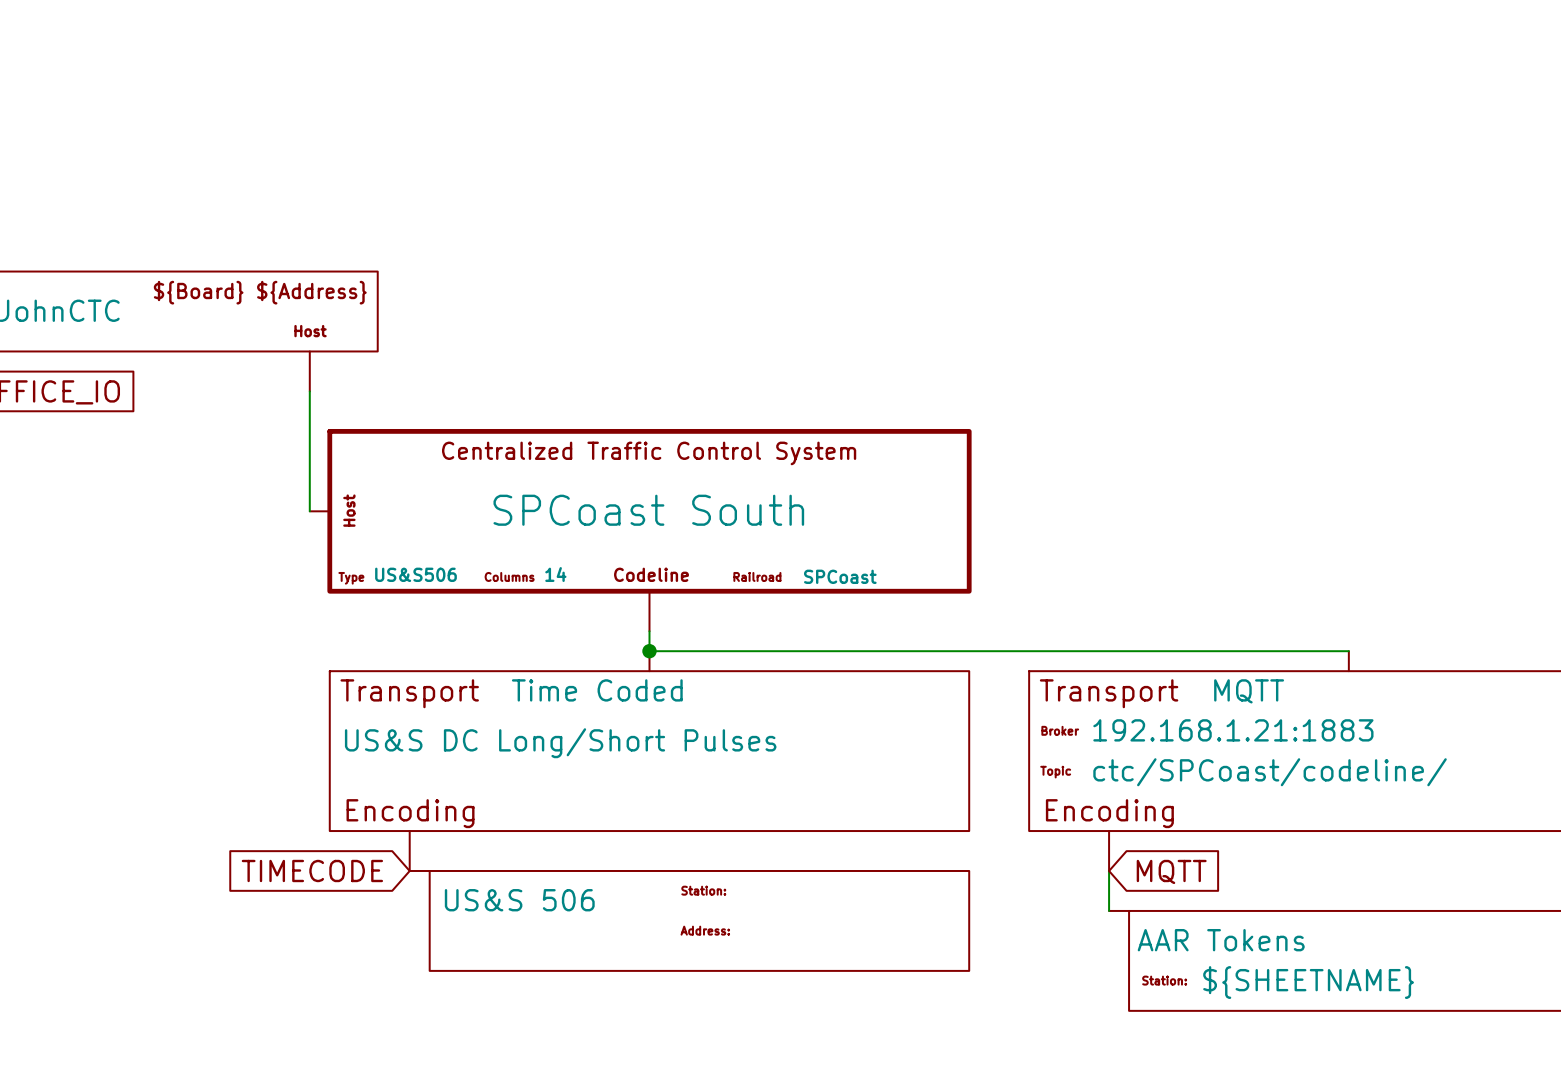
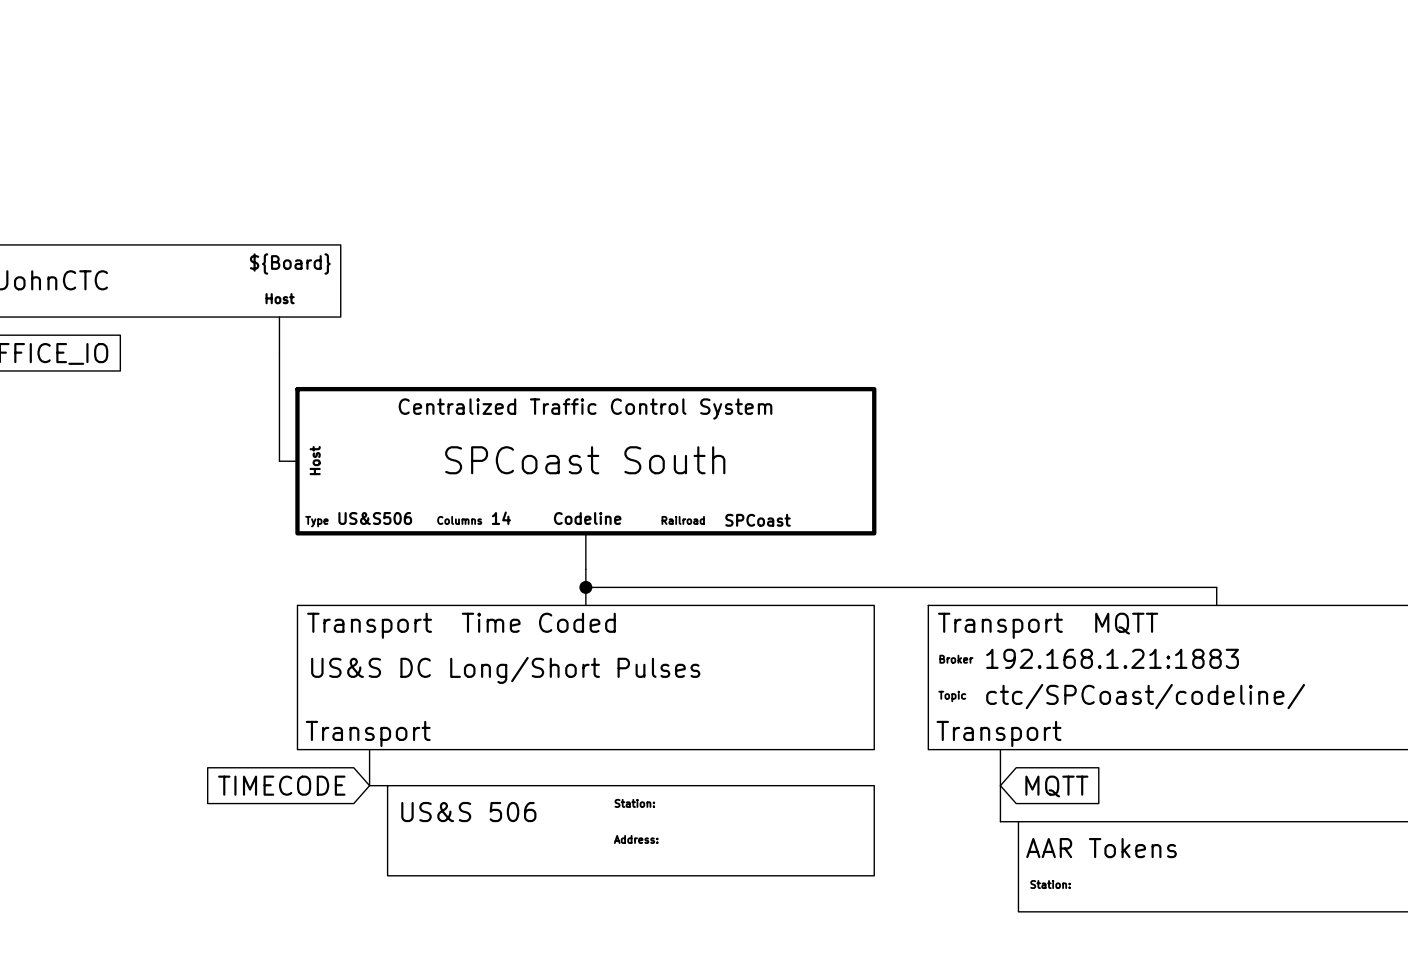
part text: ${Board} ${Address} (260, 292) -> ${Board} (290, 263)
part text: Encoding (410, 813) -> Transport (368, 733)
part text: Encoding (1109, 813) -> Transport (999, 733)
part text: ${SHEETNAME} (1308, 982) -> none

